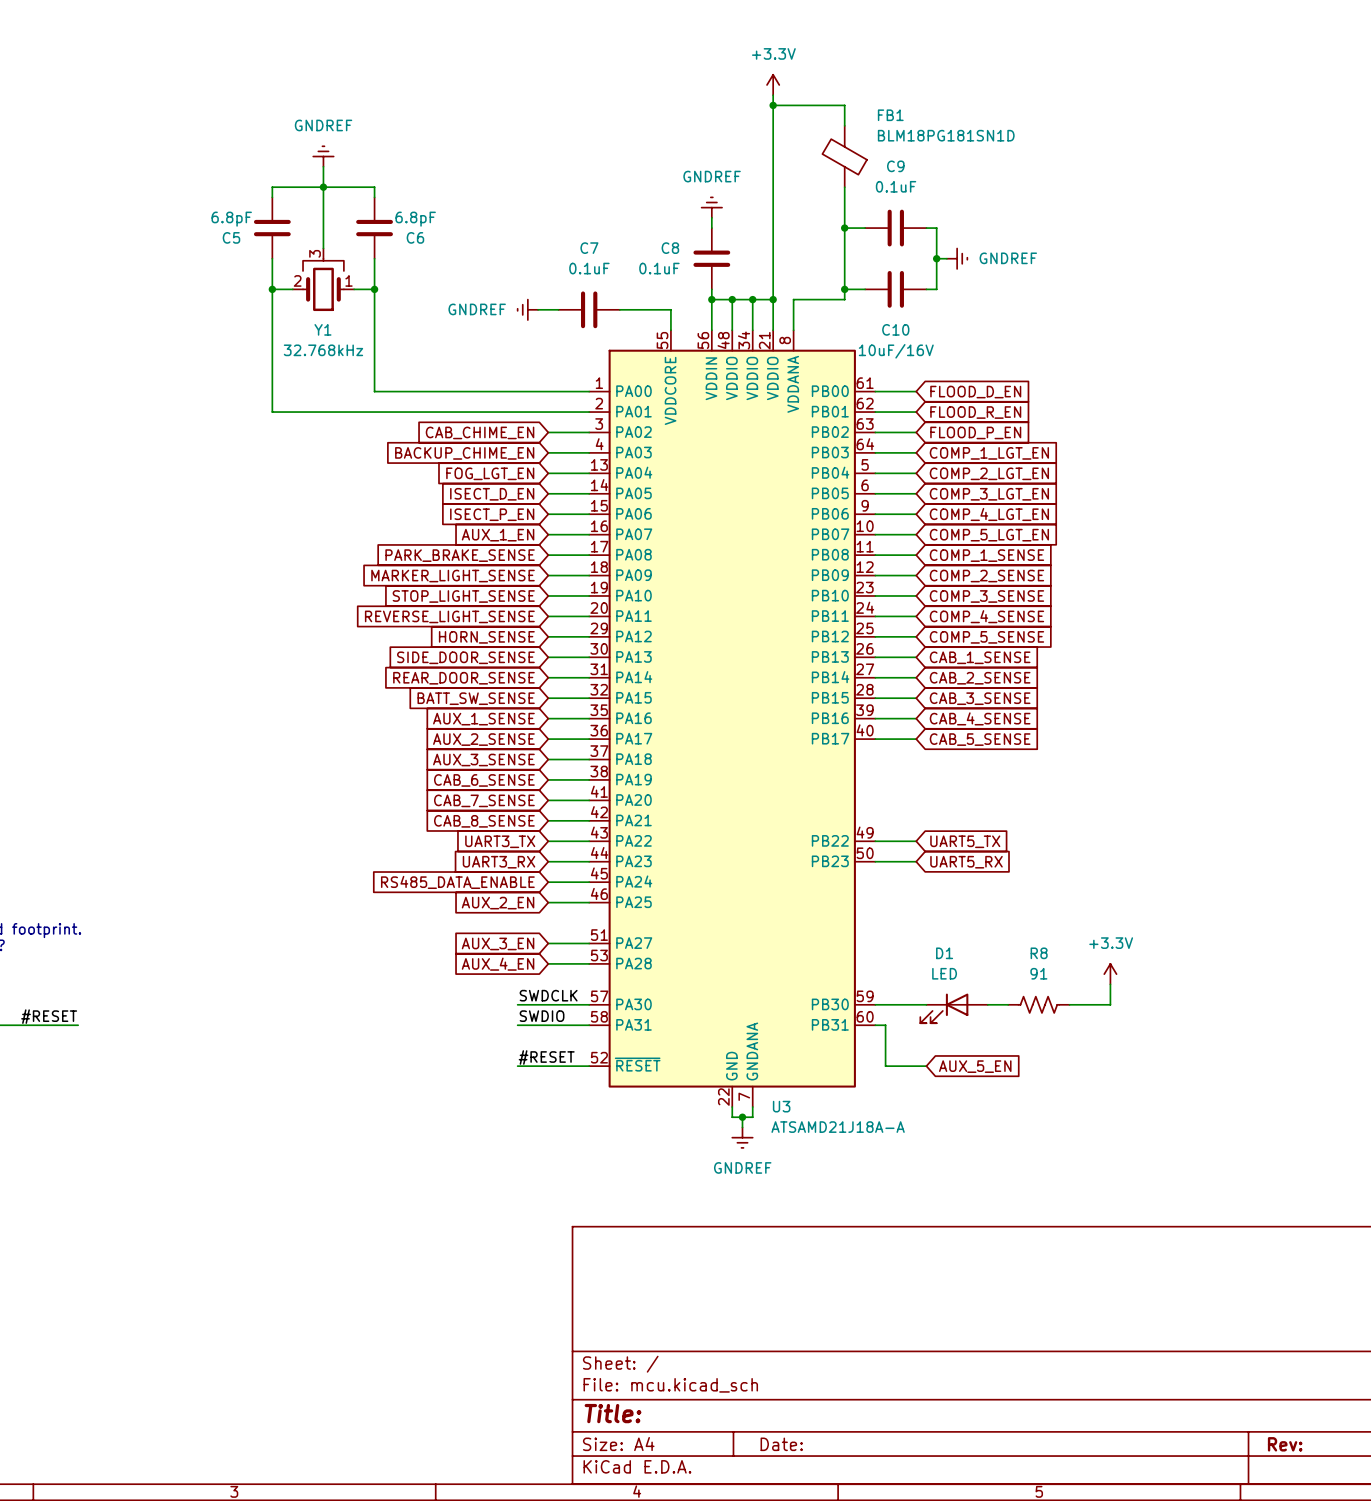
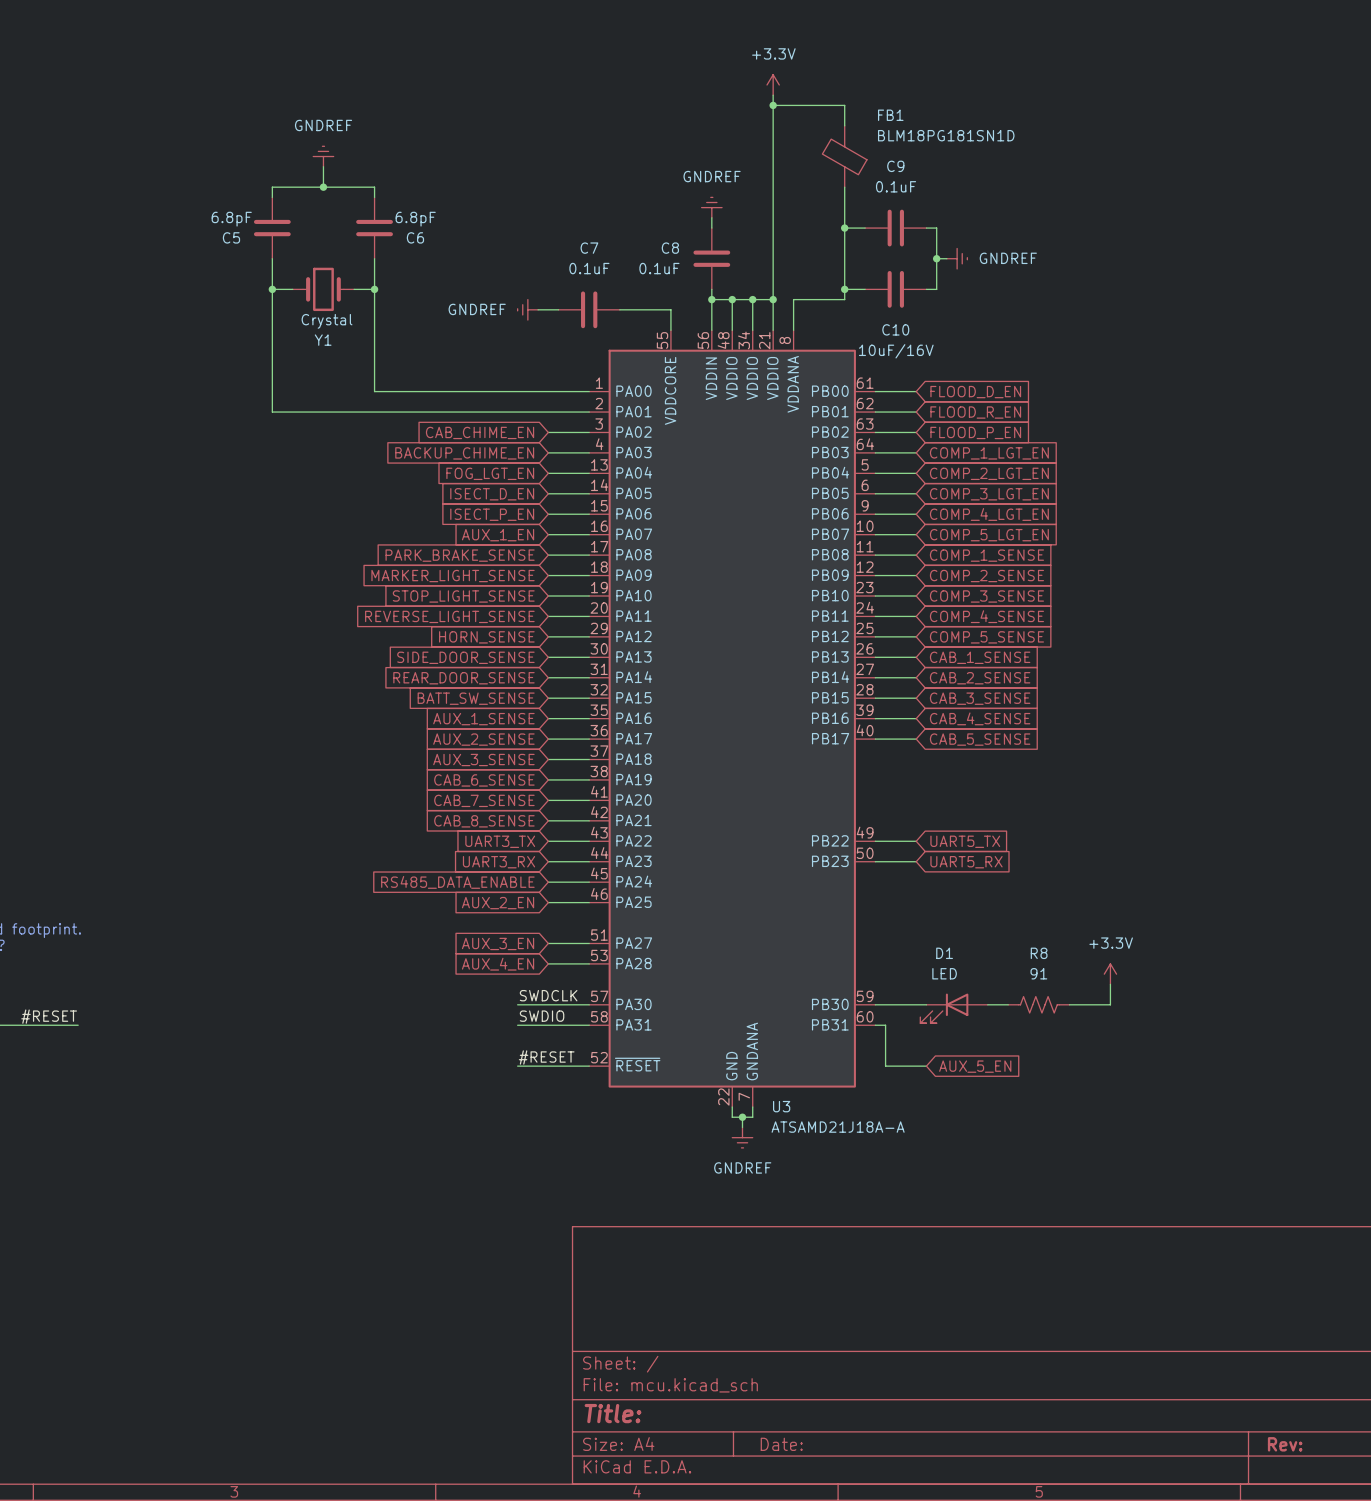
wire: (323, 187) (323, 248) -> none
Y1 symbol: [292, 248, 355, 312] -> [292, 267, 355, 312]
Y1 value: 32.768kHz (323, 350) -> Crystal (327, 321)

